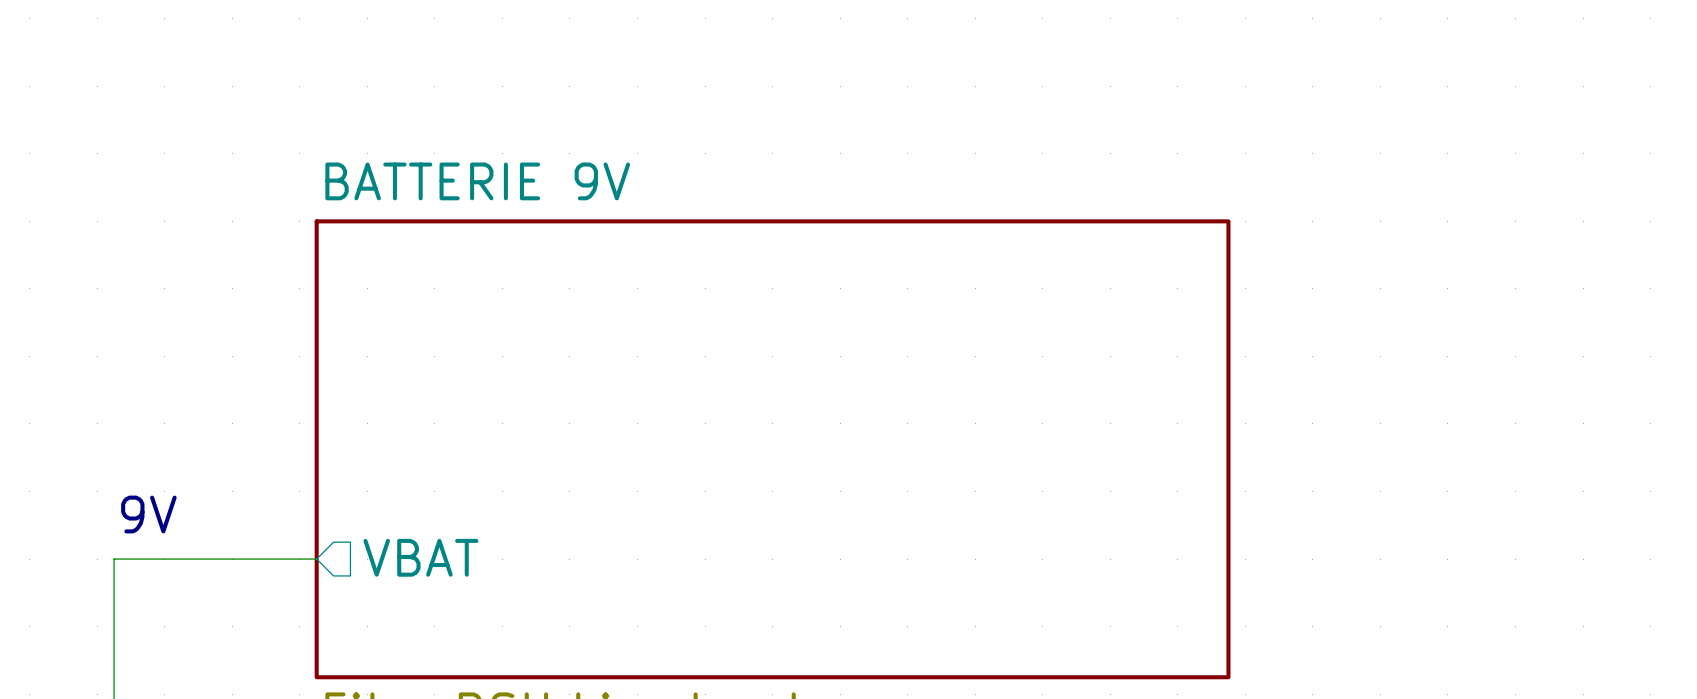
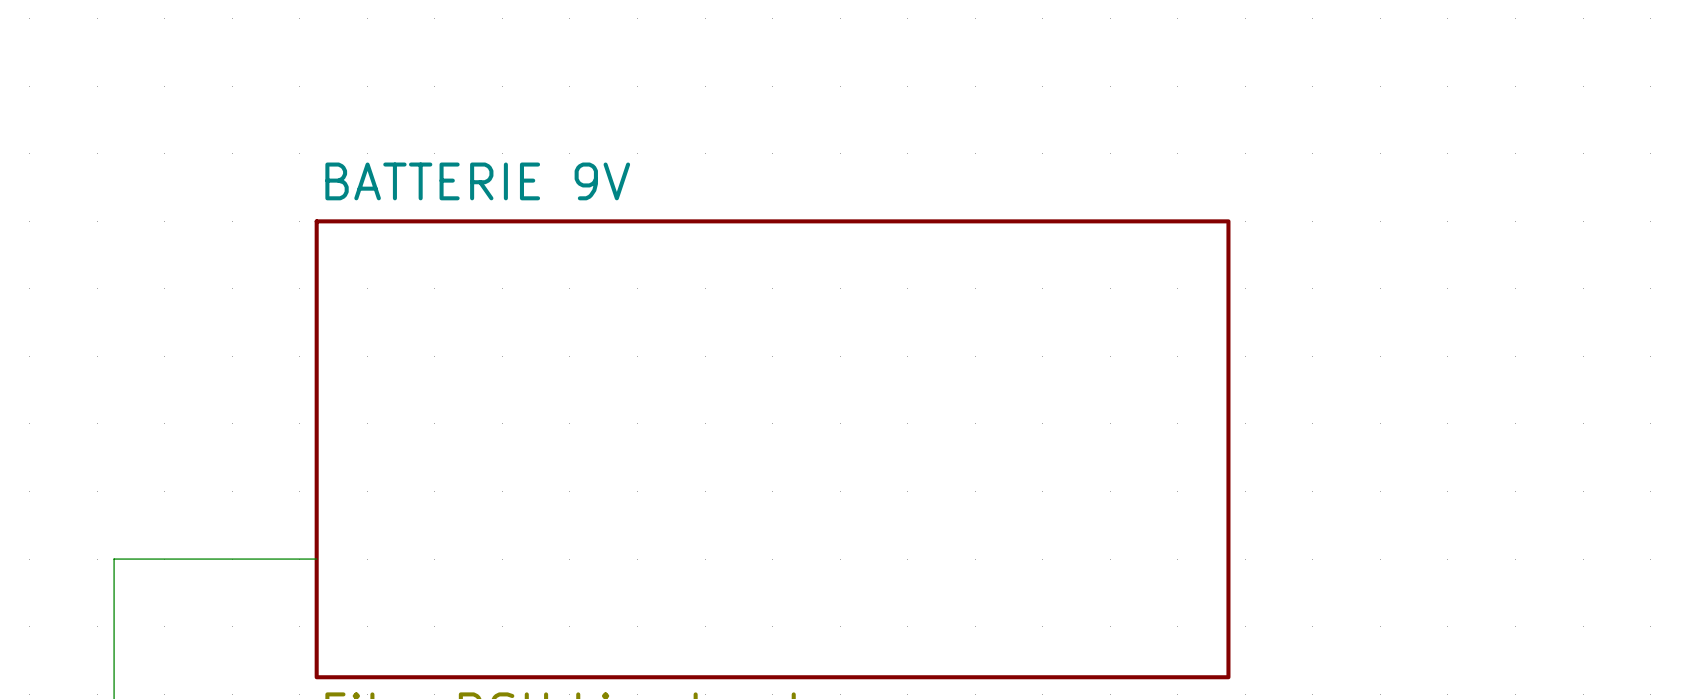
text: 9V (148, 514) -> none
sheet pin: VBAT (420, 557) -> none

